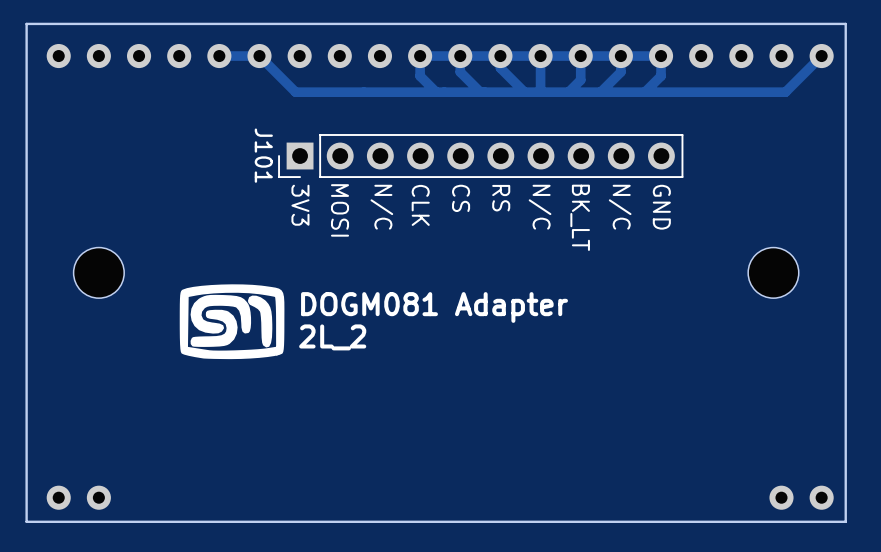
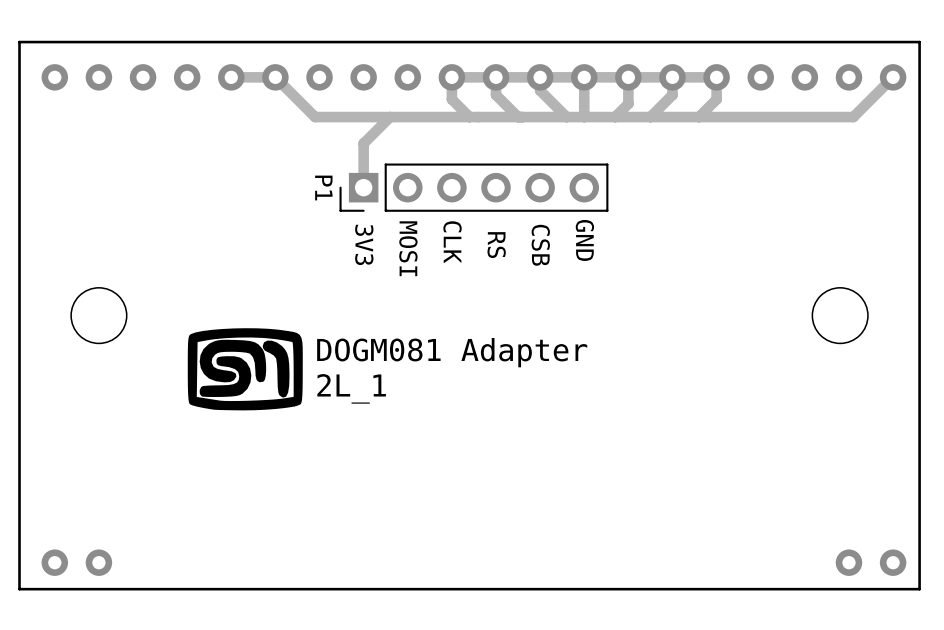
track: none -> (390, 117) (363, 143) (363, 187)
P1: none -> (473, 187)
J101: (480, 156) -> none
text: CS (461, 198) -> none
text position: RS (501, 198) -> RS (496, 245)
text position: 3V3 (300, 205) -> 3V3 (364, 244)
text: N/C (381, 207) -> none
text: N/C (540, 207) -> none
text: N/C (620, 207) -> none
text position: GND (661, 207) -> GND (584, 240)
text: none -> CSB (540, 245)
text position: MOSI (340, 210) -> MOSI (408, 248)
text: BK_LT (580, 217) -> none
text: 2L_2 (332, 337) -> 2L_1 (351, 388)

